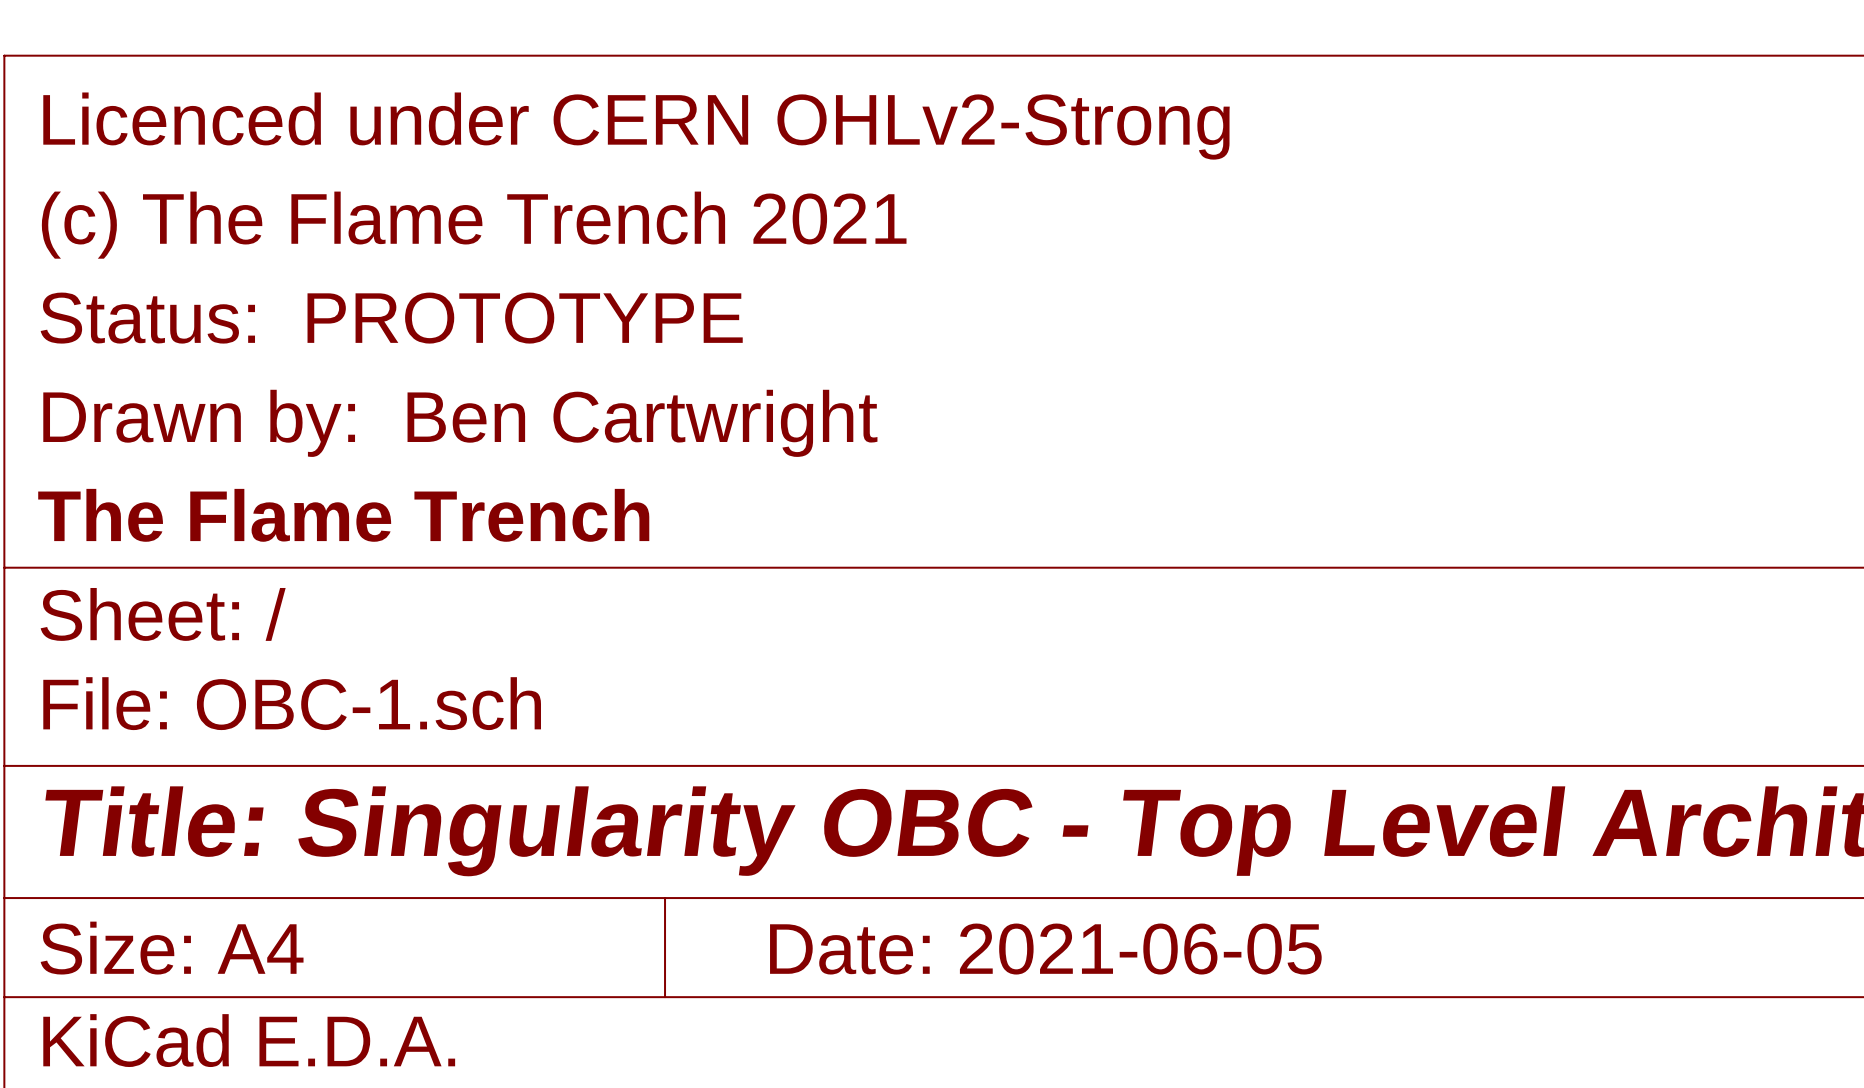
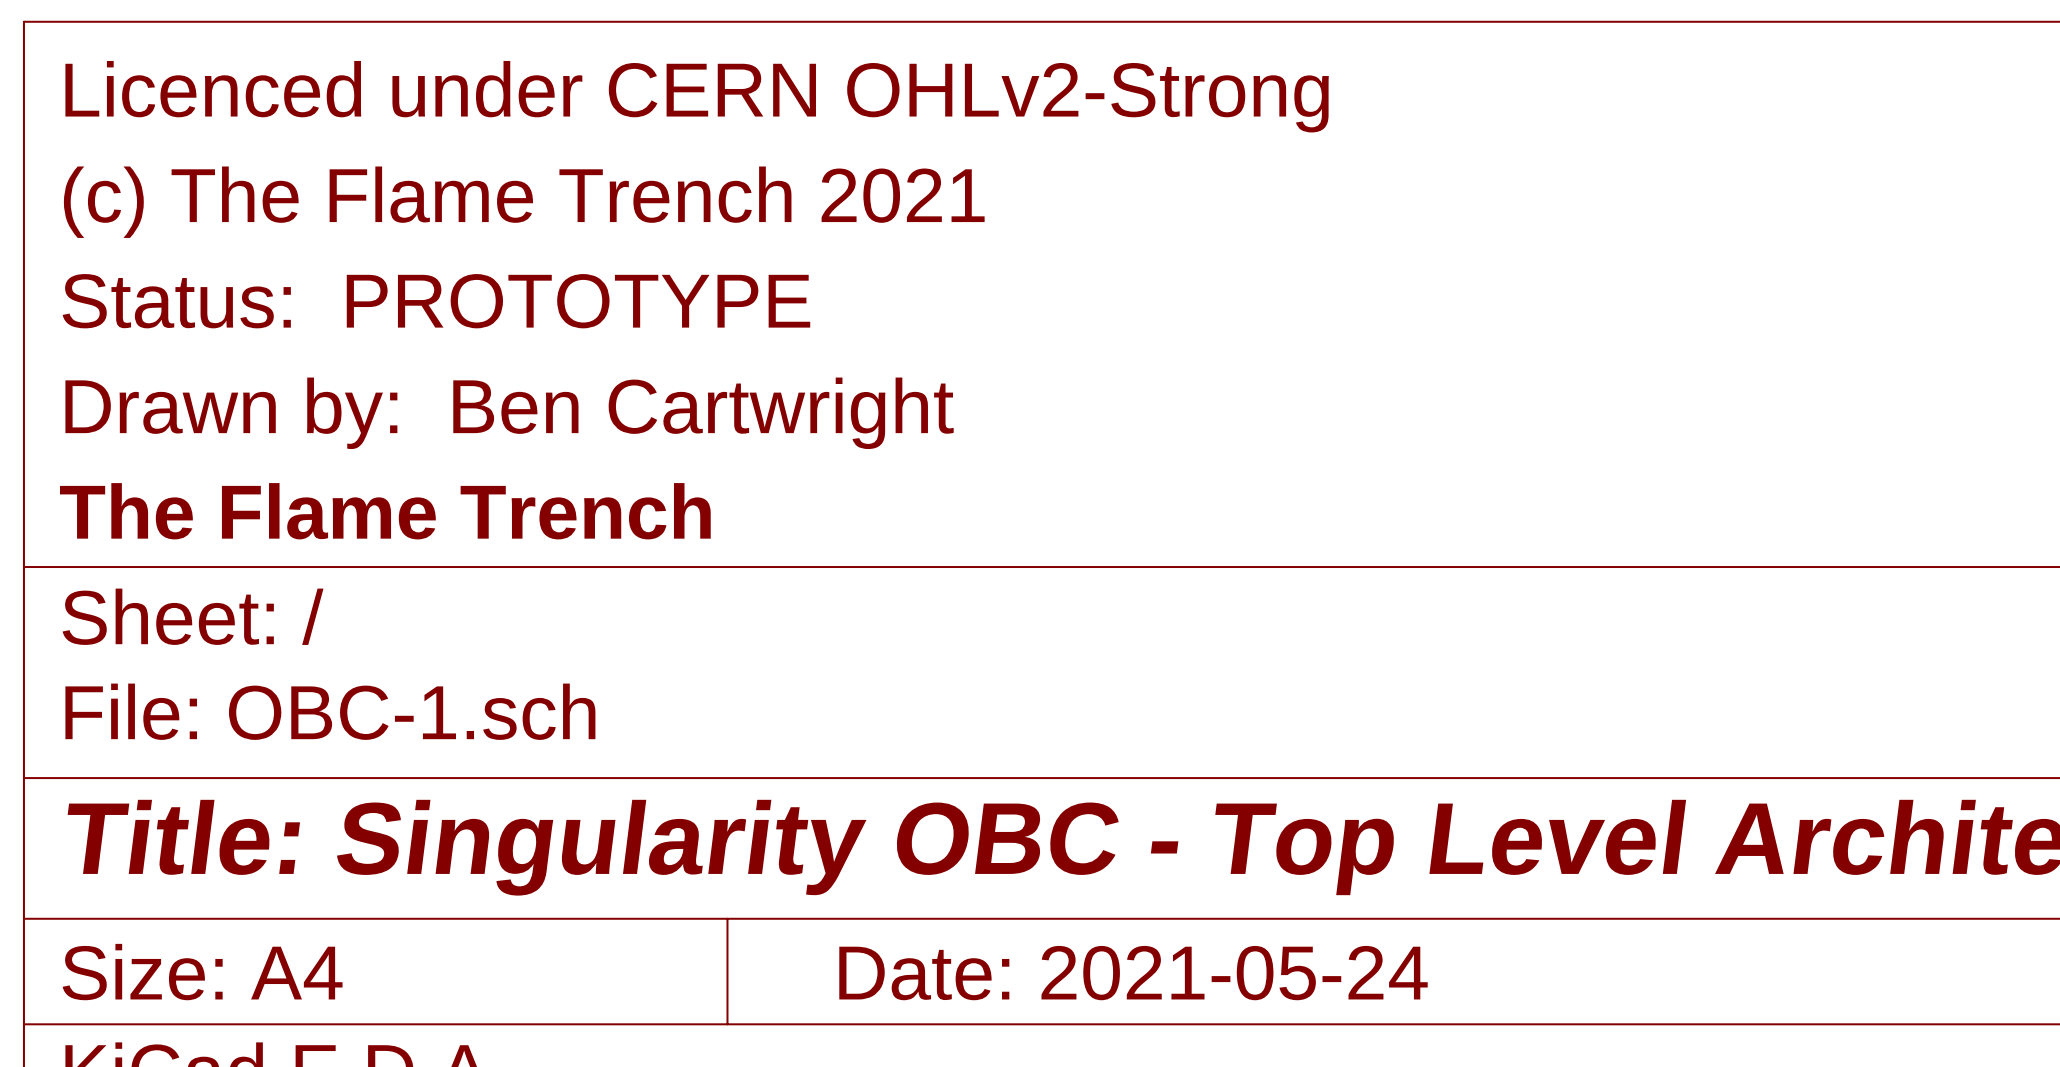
title block: Date: 2021-06-05 (1045, 949) -> Date: 2021-05-24 (1133, 973)

